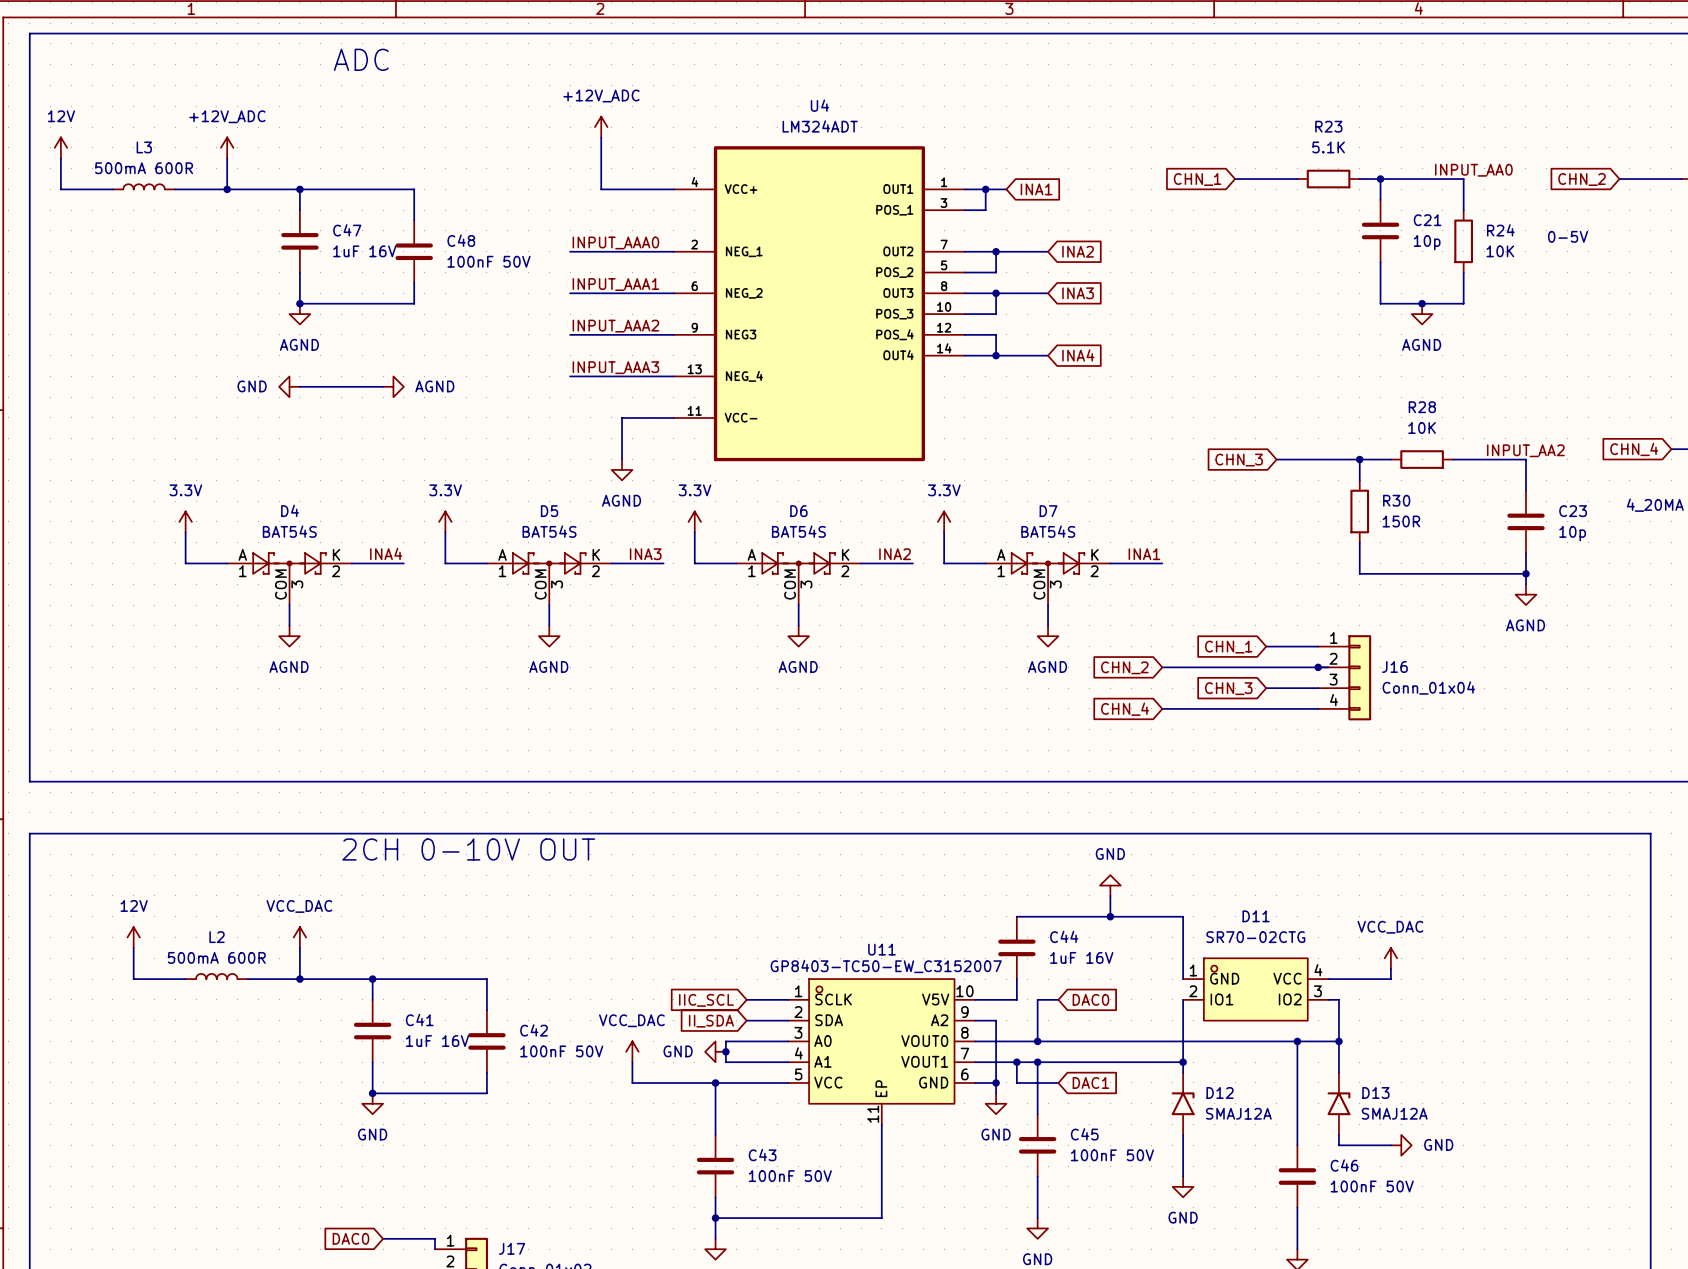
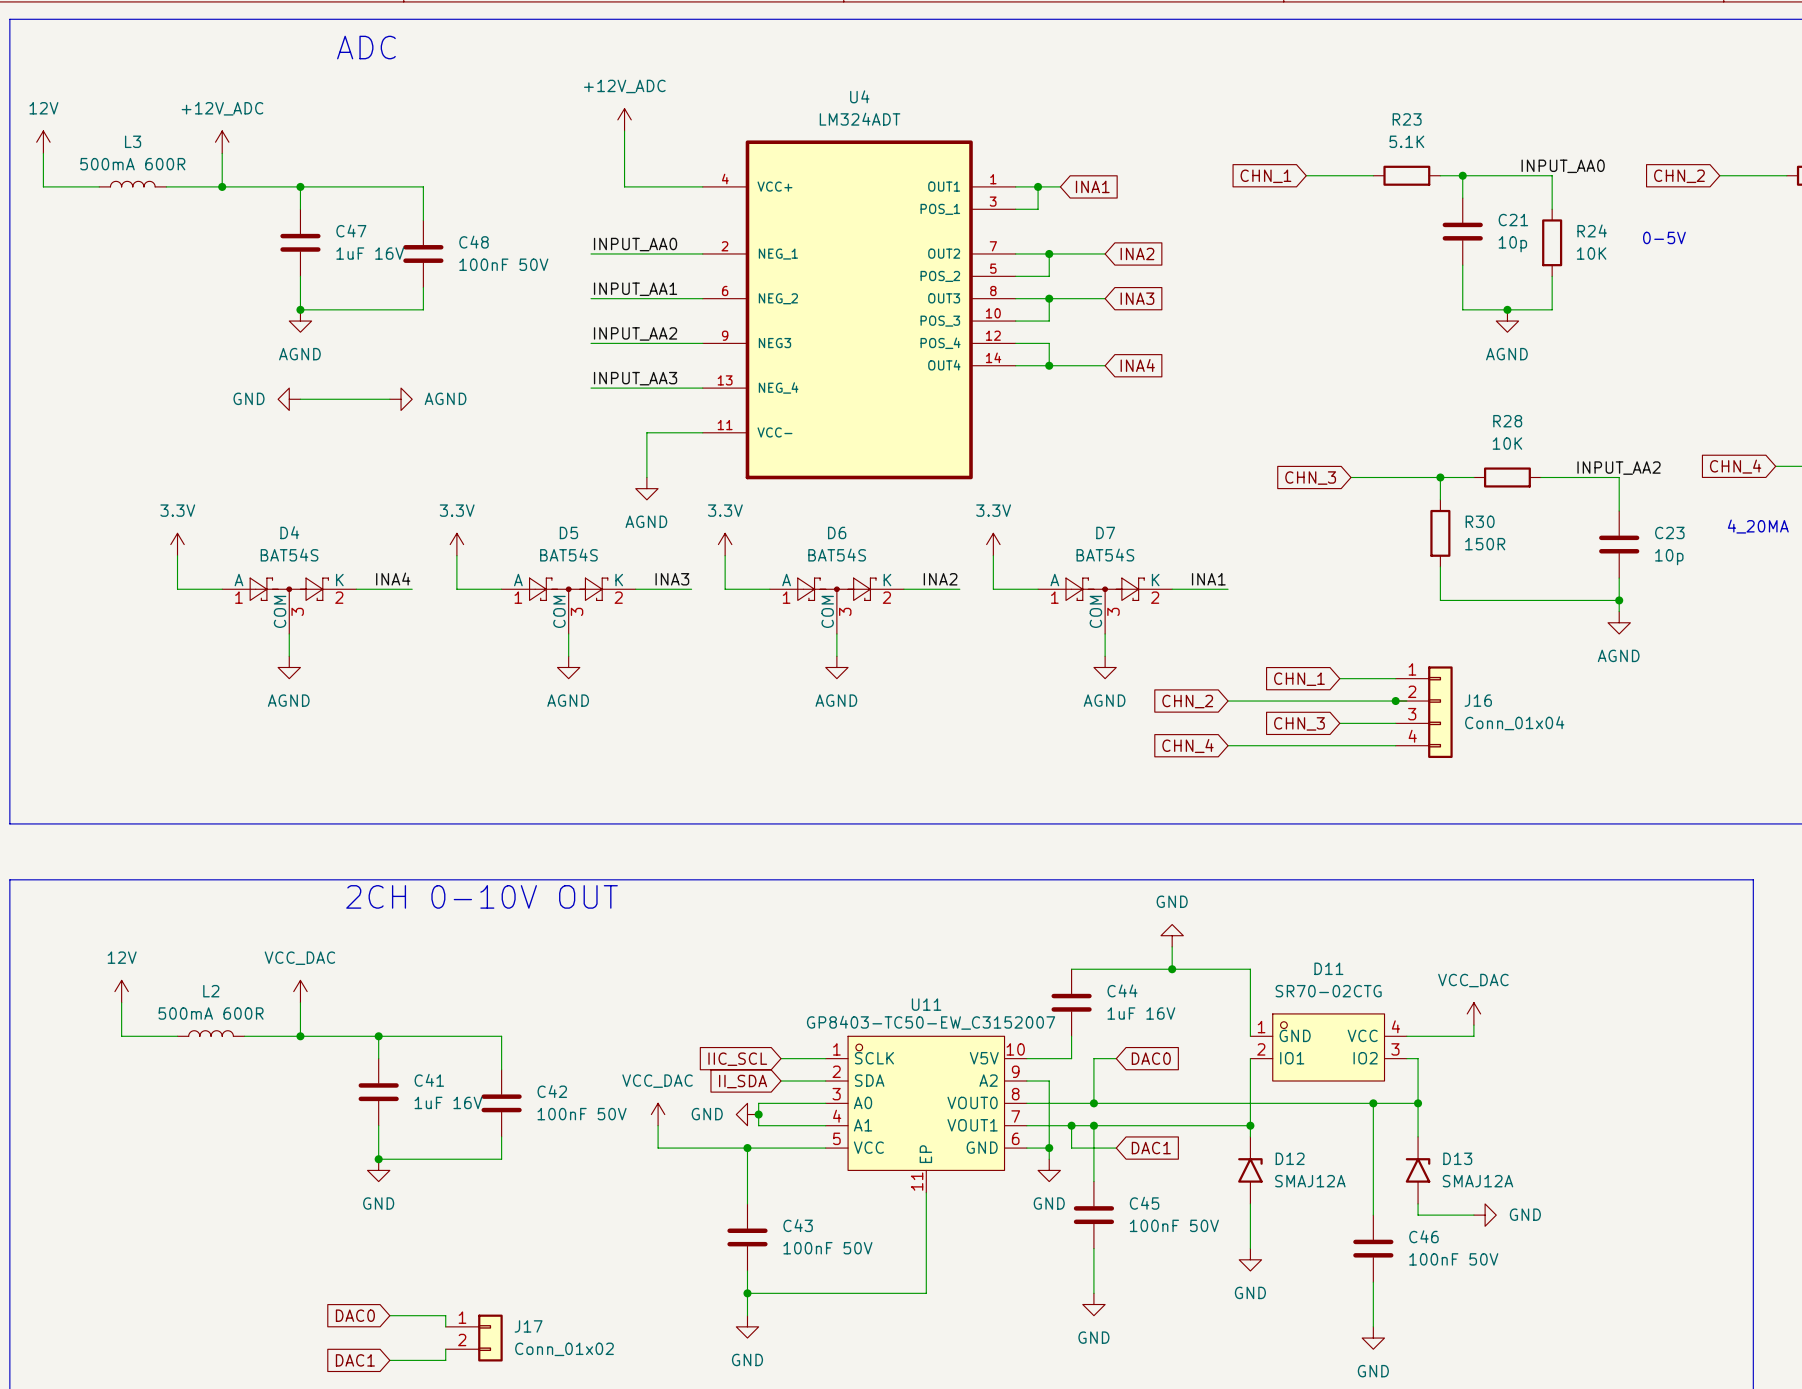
label: INPUT_AAA0 (615, 242) -> INPUT_AA0 (635, 244)
label: INPUT_AAA1 (615, 284) -> INPUT_AA1 (635, 289)
label: INPUT_AAA2 (615, 326) -> INPUT_AA2 (635, 333)
label: INPUT_AAA3 (615, 367) -> INPUT_AA3 (635, 378)

